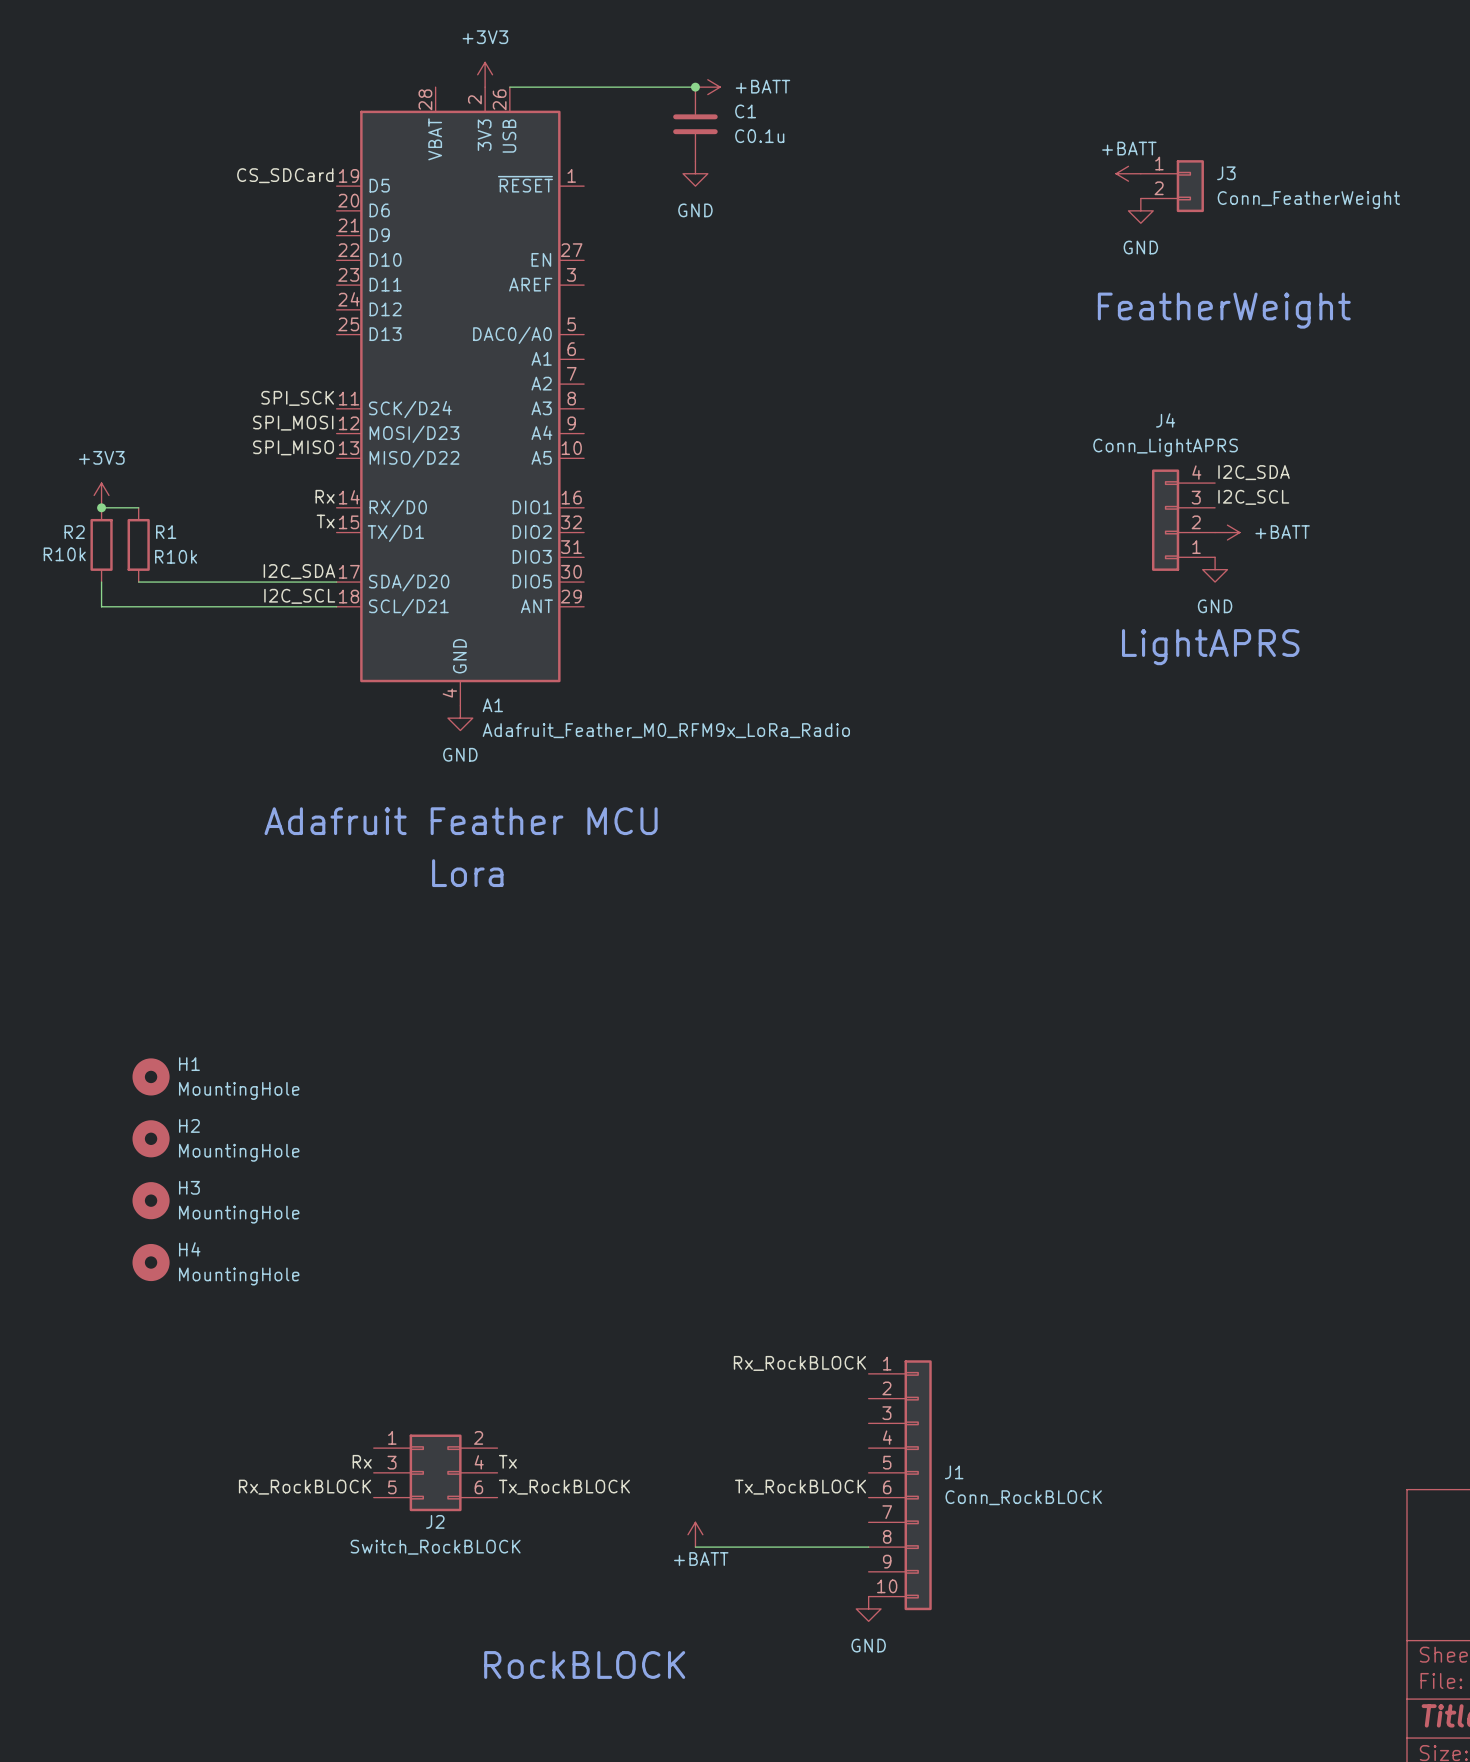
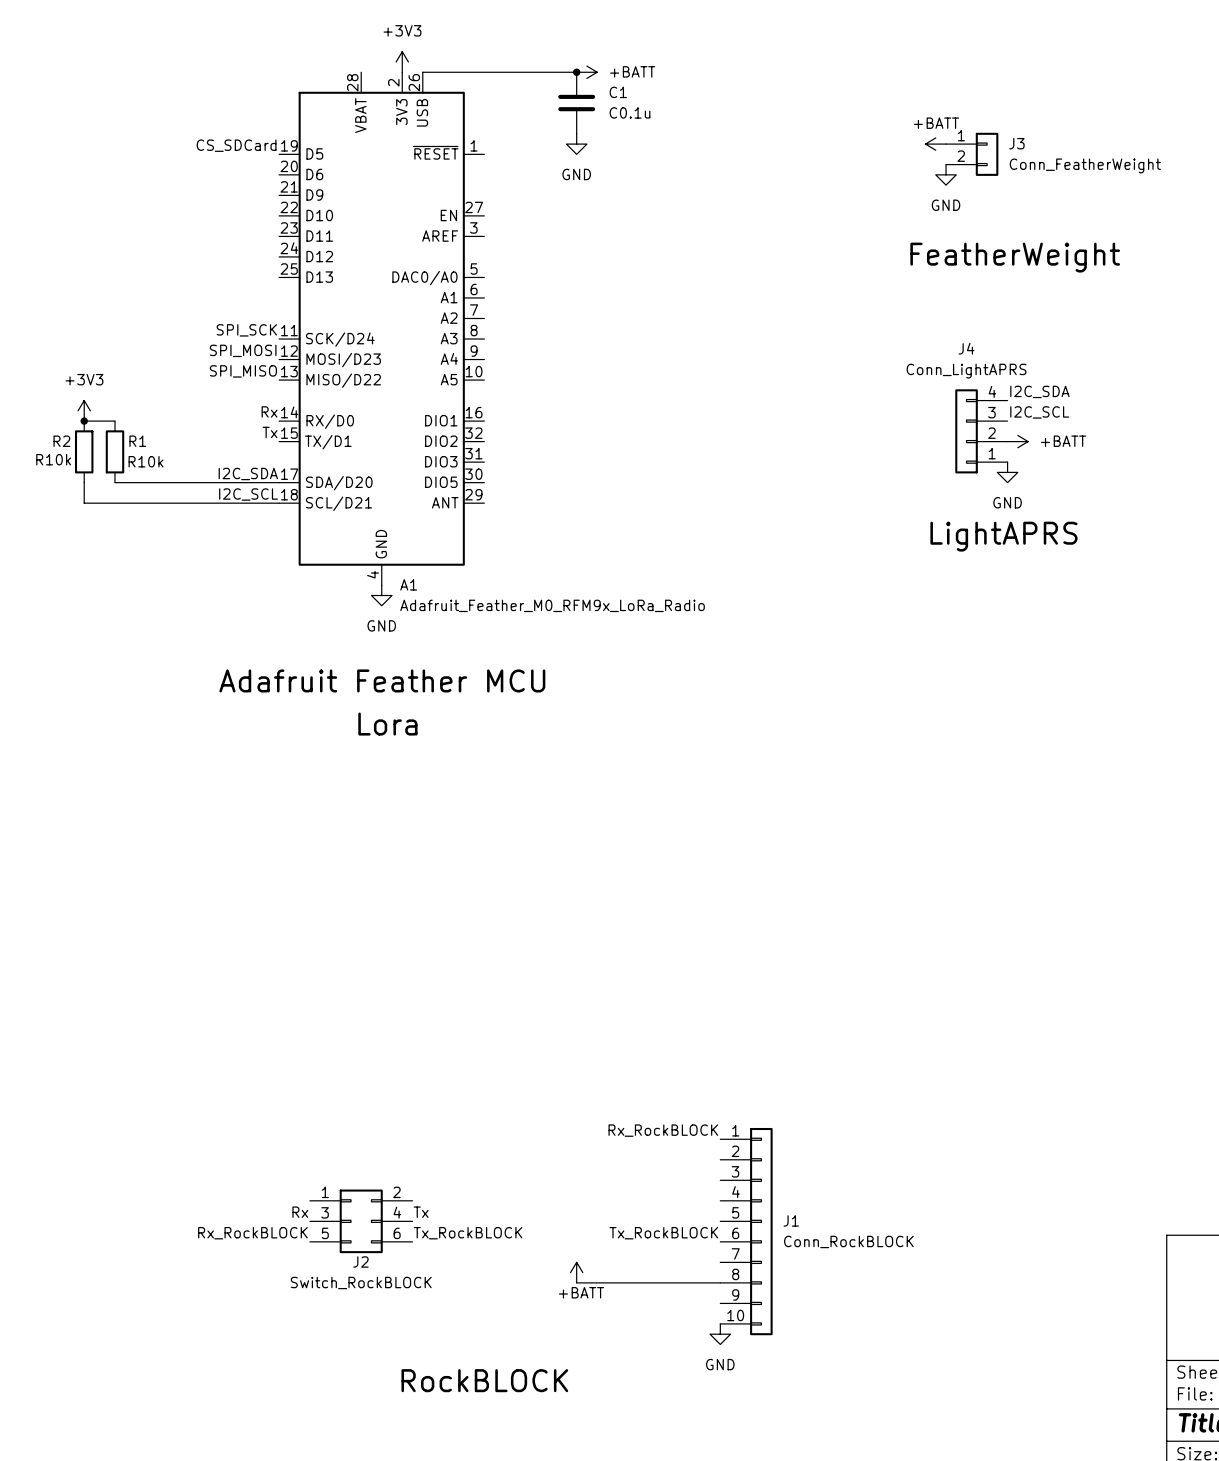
H1: MountingHole (151, 1076) -> none
H2: MountingHole (151, 1138) -> none
H3: MountingHole (151, 1200) -> none
H4: MountingHole (151, 1262) -> none

